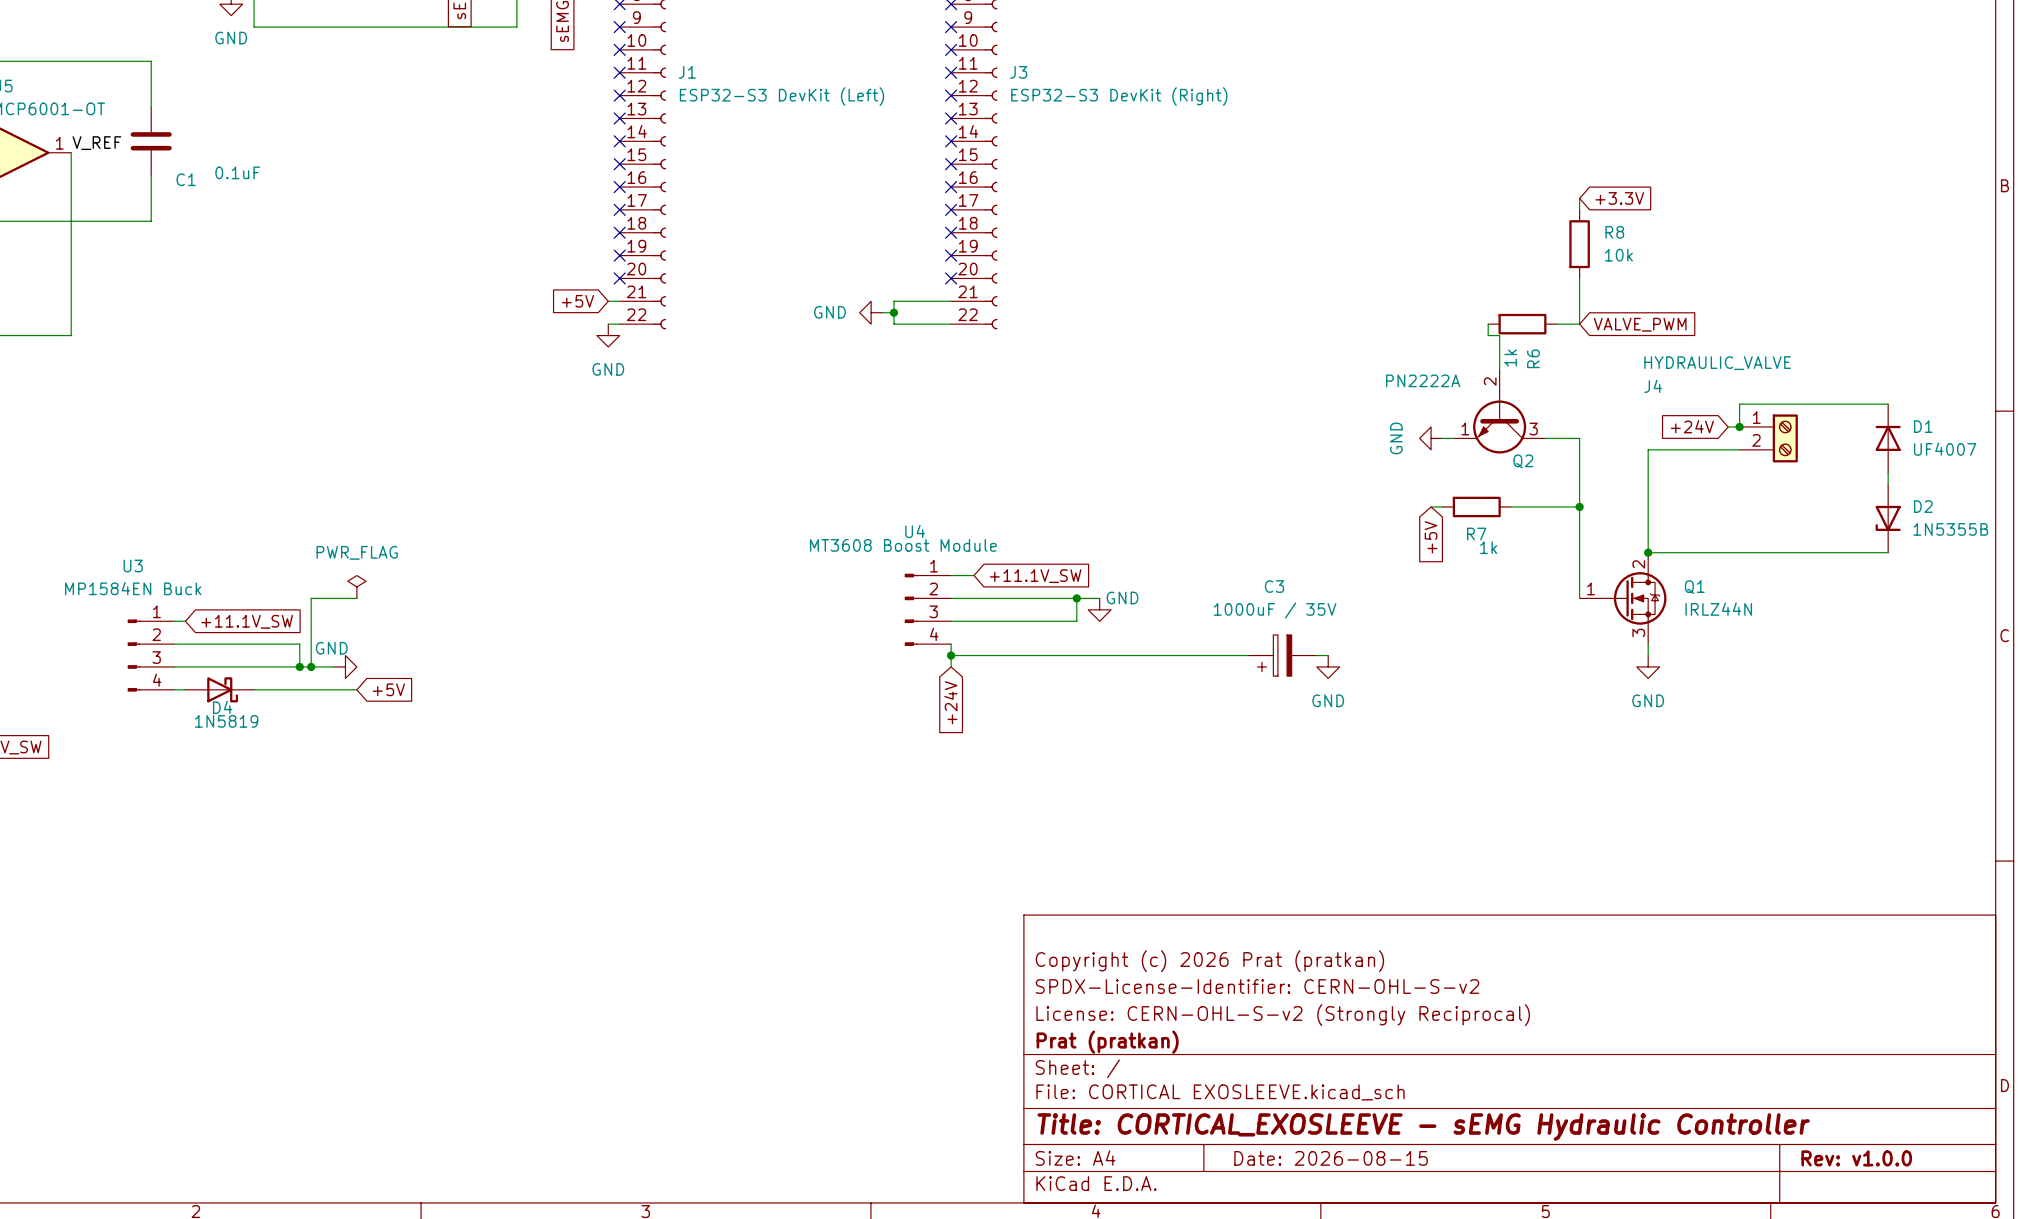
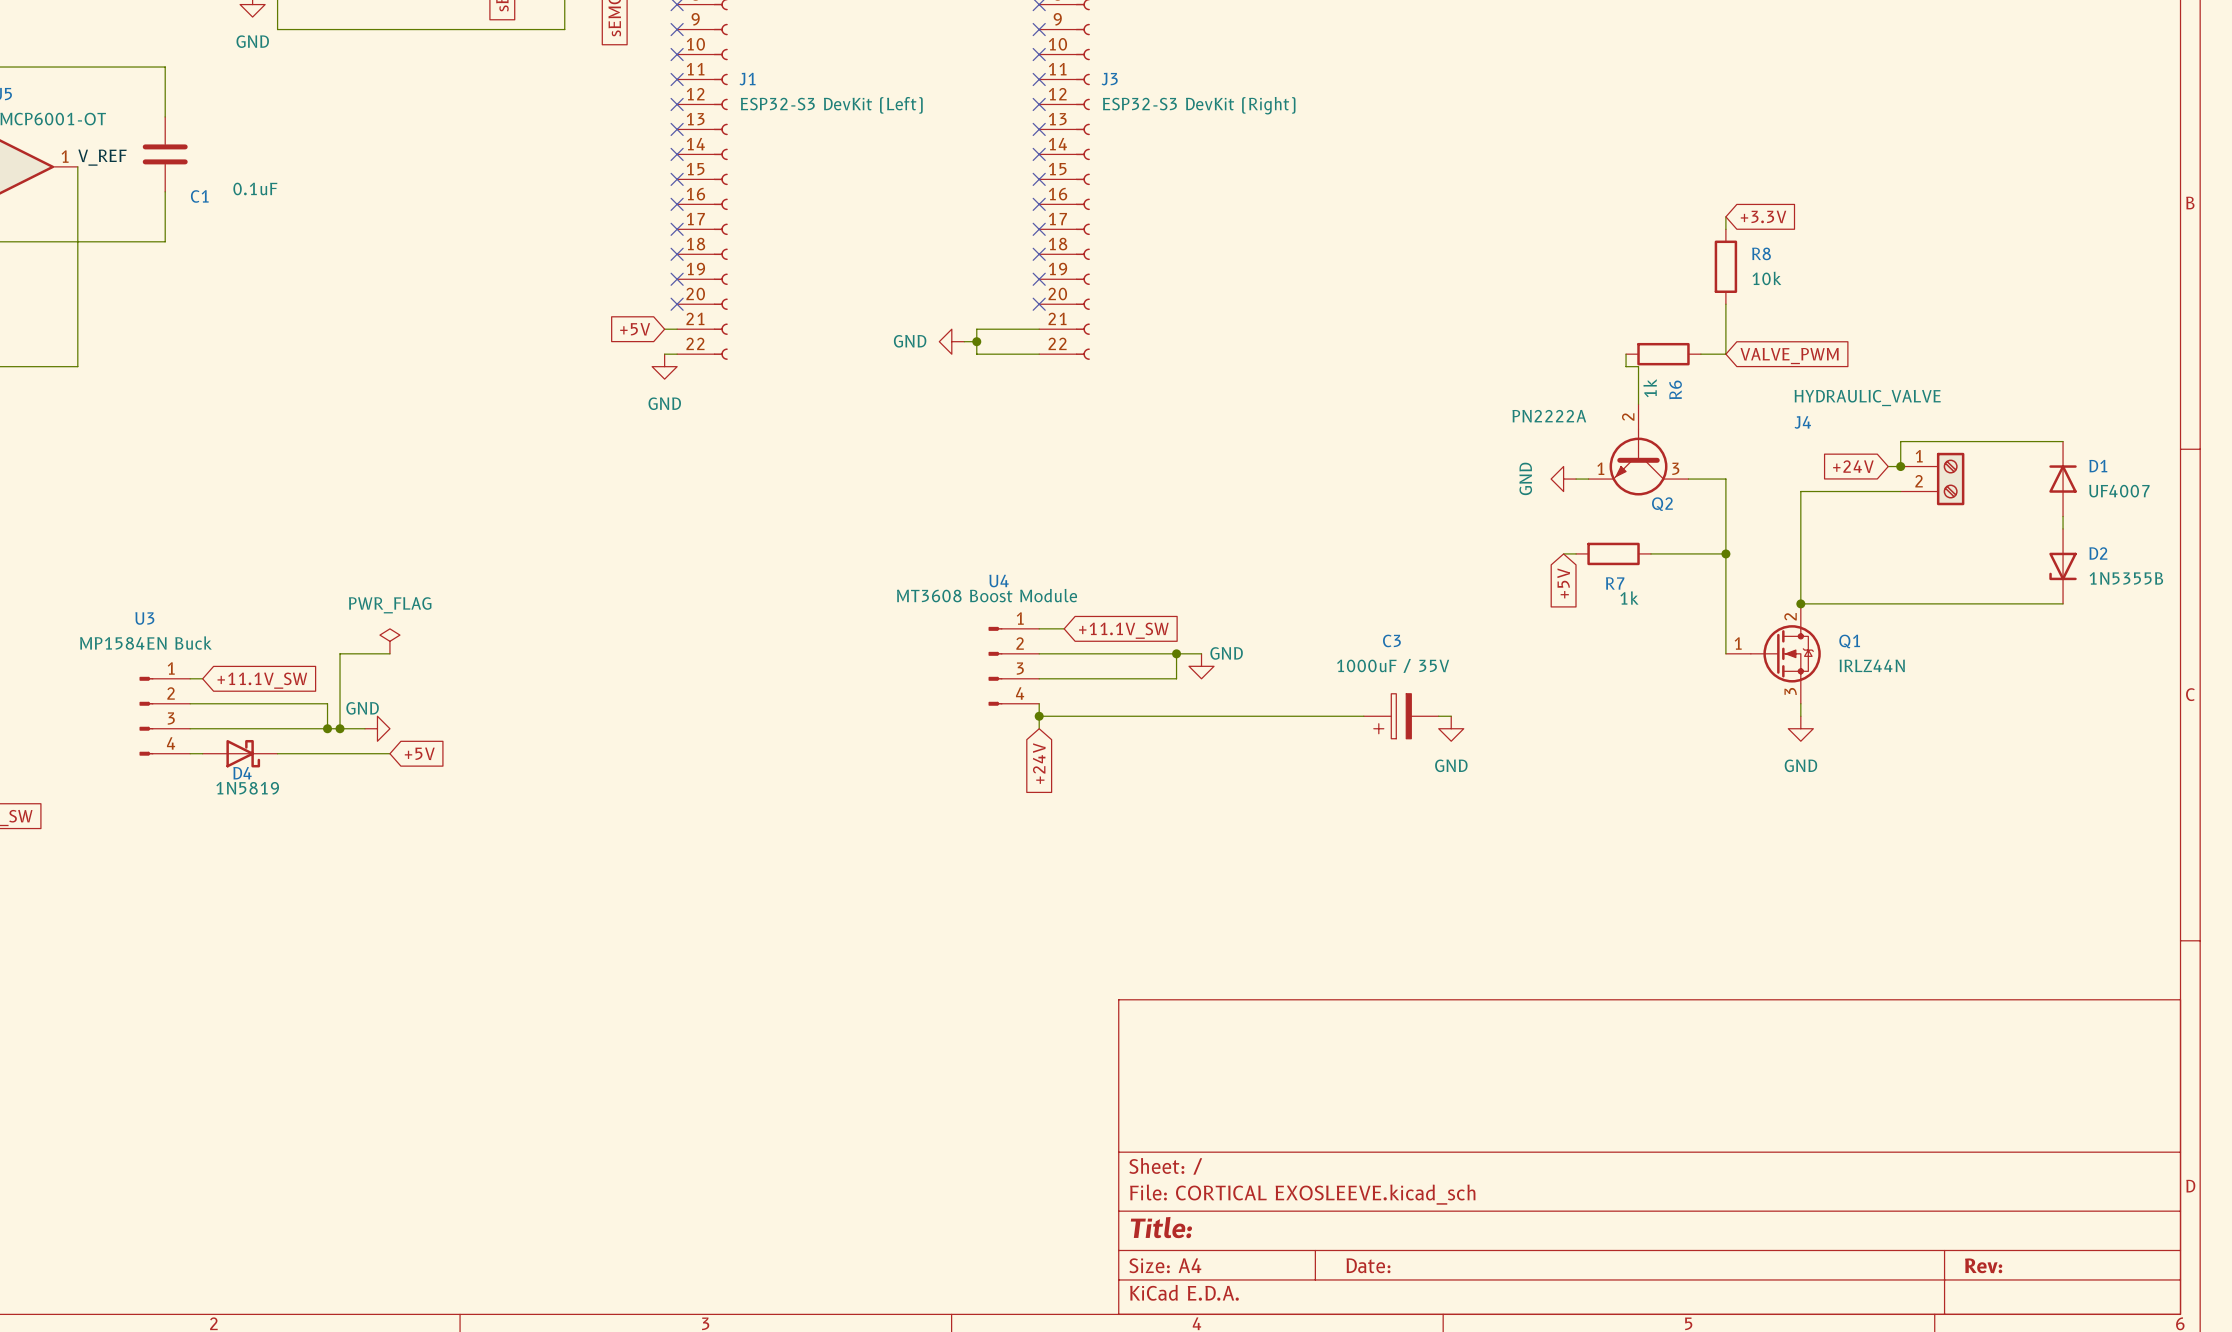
title block: Copyright (c) 2026 Prat (pratkan) (1209, 961) -> none
title block: SPDX-License-Identifier: CERN-OHL-S-v2 (1257, 986) -> none
title block: License: CERN-OHL-S-v2 (Strongly Reciprocal) (1283, 1015) -> none
title block: Prat (pratkan) (1107, 1042) -> none
title block: Title: CORTICAL_EXOSLEEVE - sEMG Hydraulic Controller (1423, 1127) -> Title: (1161, 1227)
title block: Date: 2026-08-15 (1331, 1158) -> Date: (1368, 1265)
title block: Rev: v1.0.0 (1856, 1158) -> Rev: (1983, 1265)

